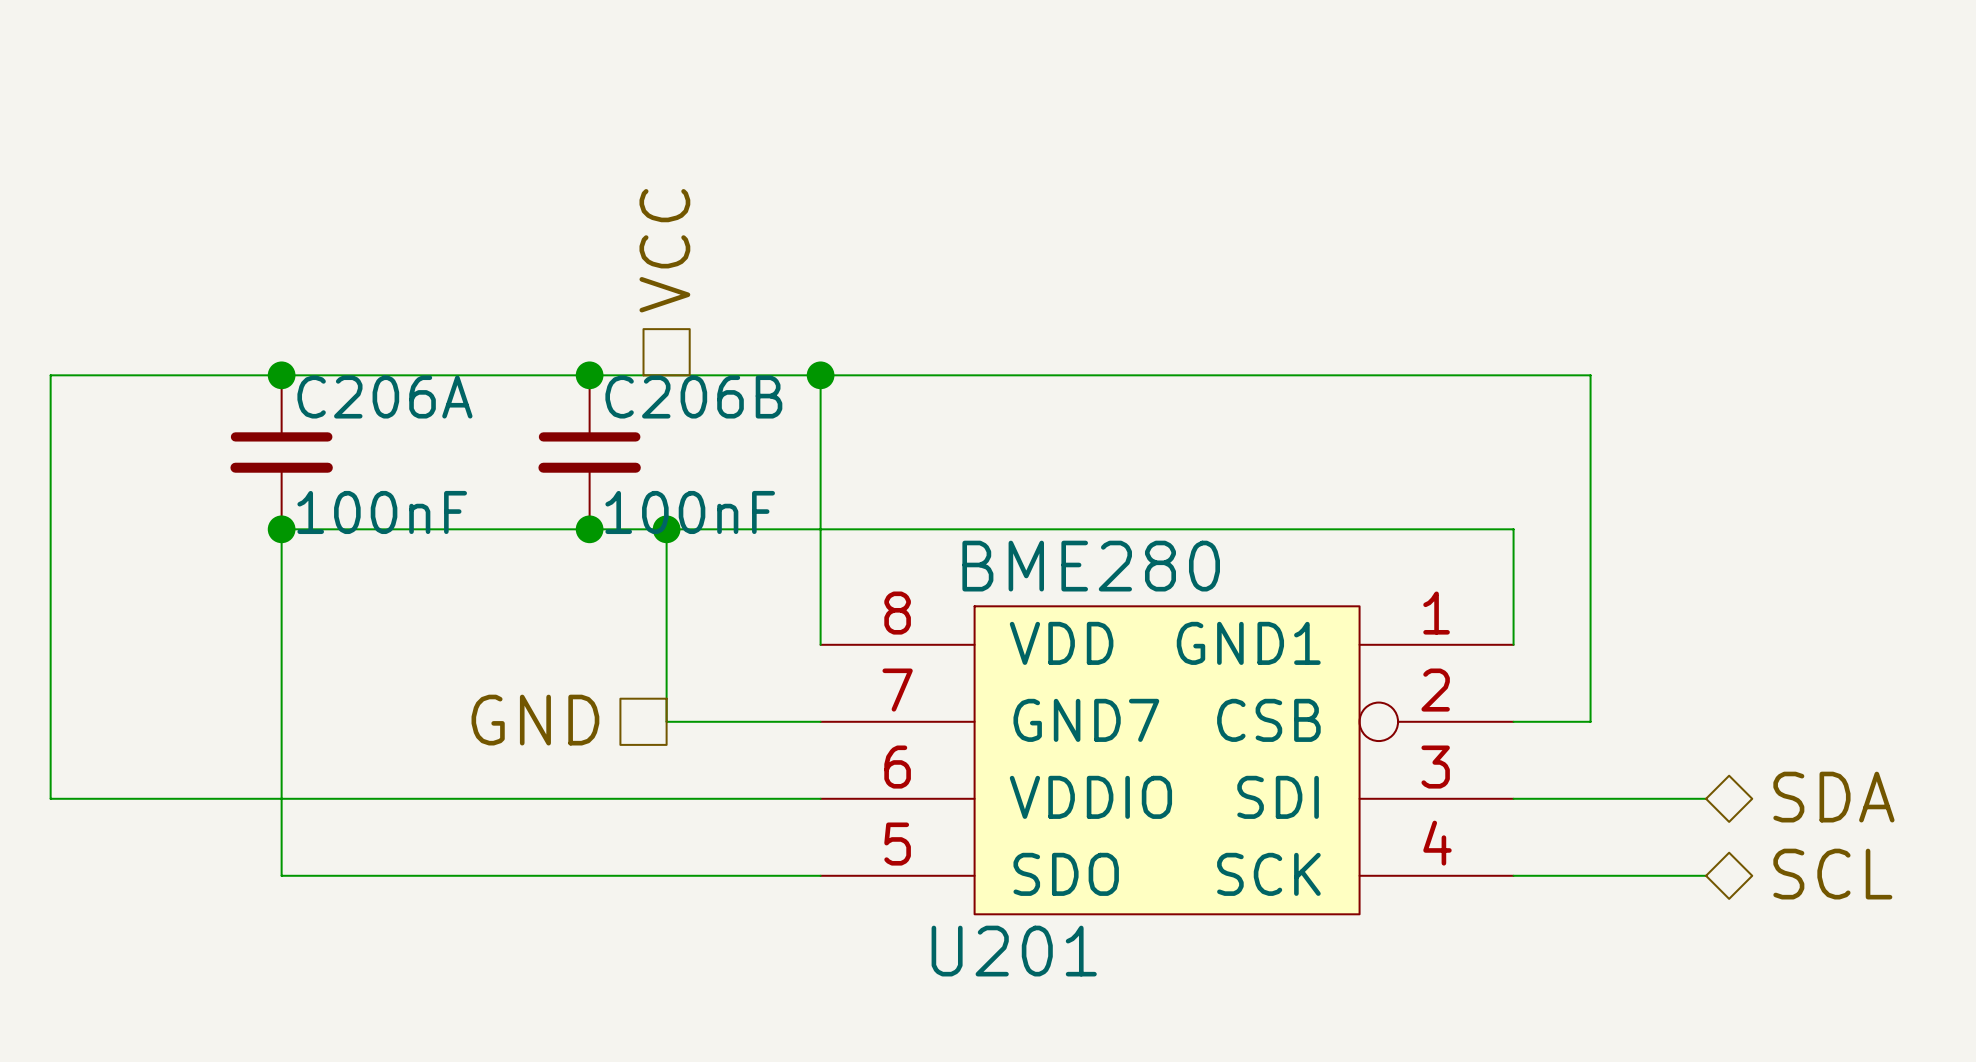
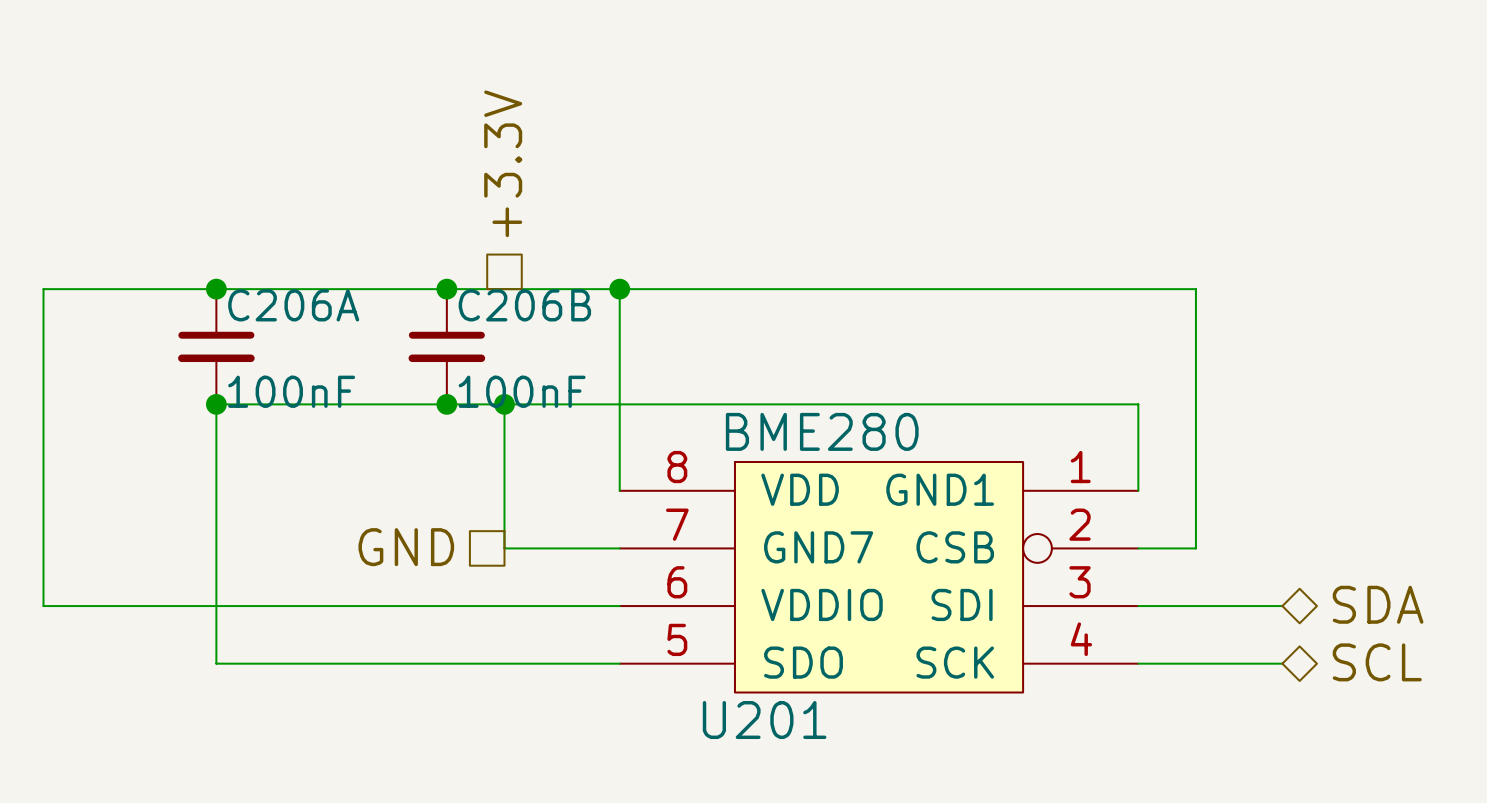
hierarchical label: VCC (664, 250) -> +3.3V (503, 163)

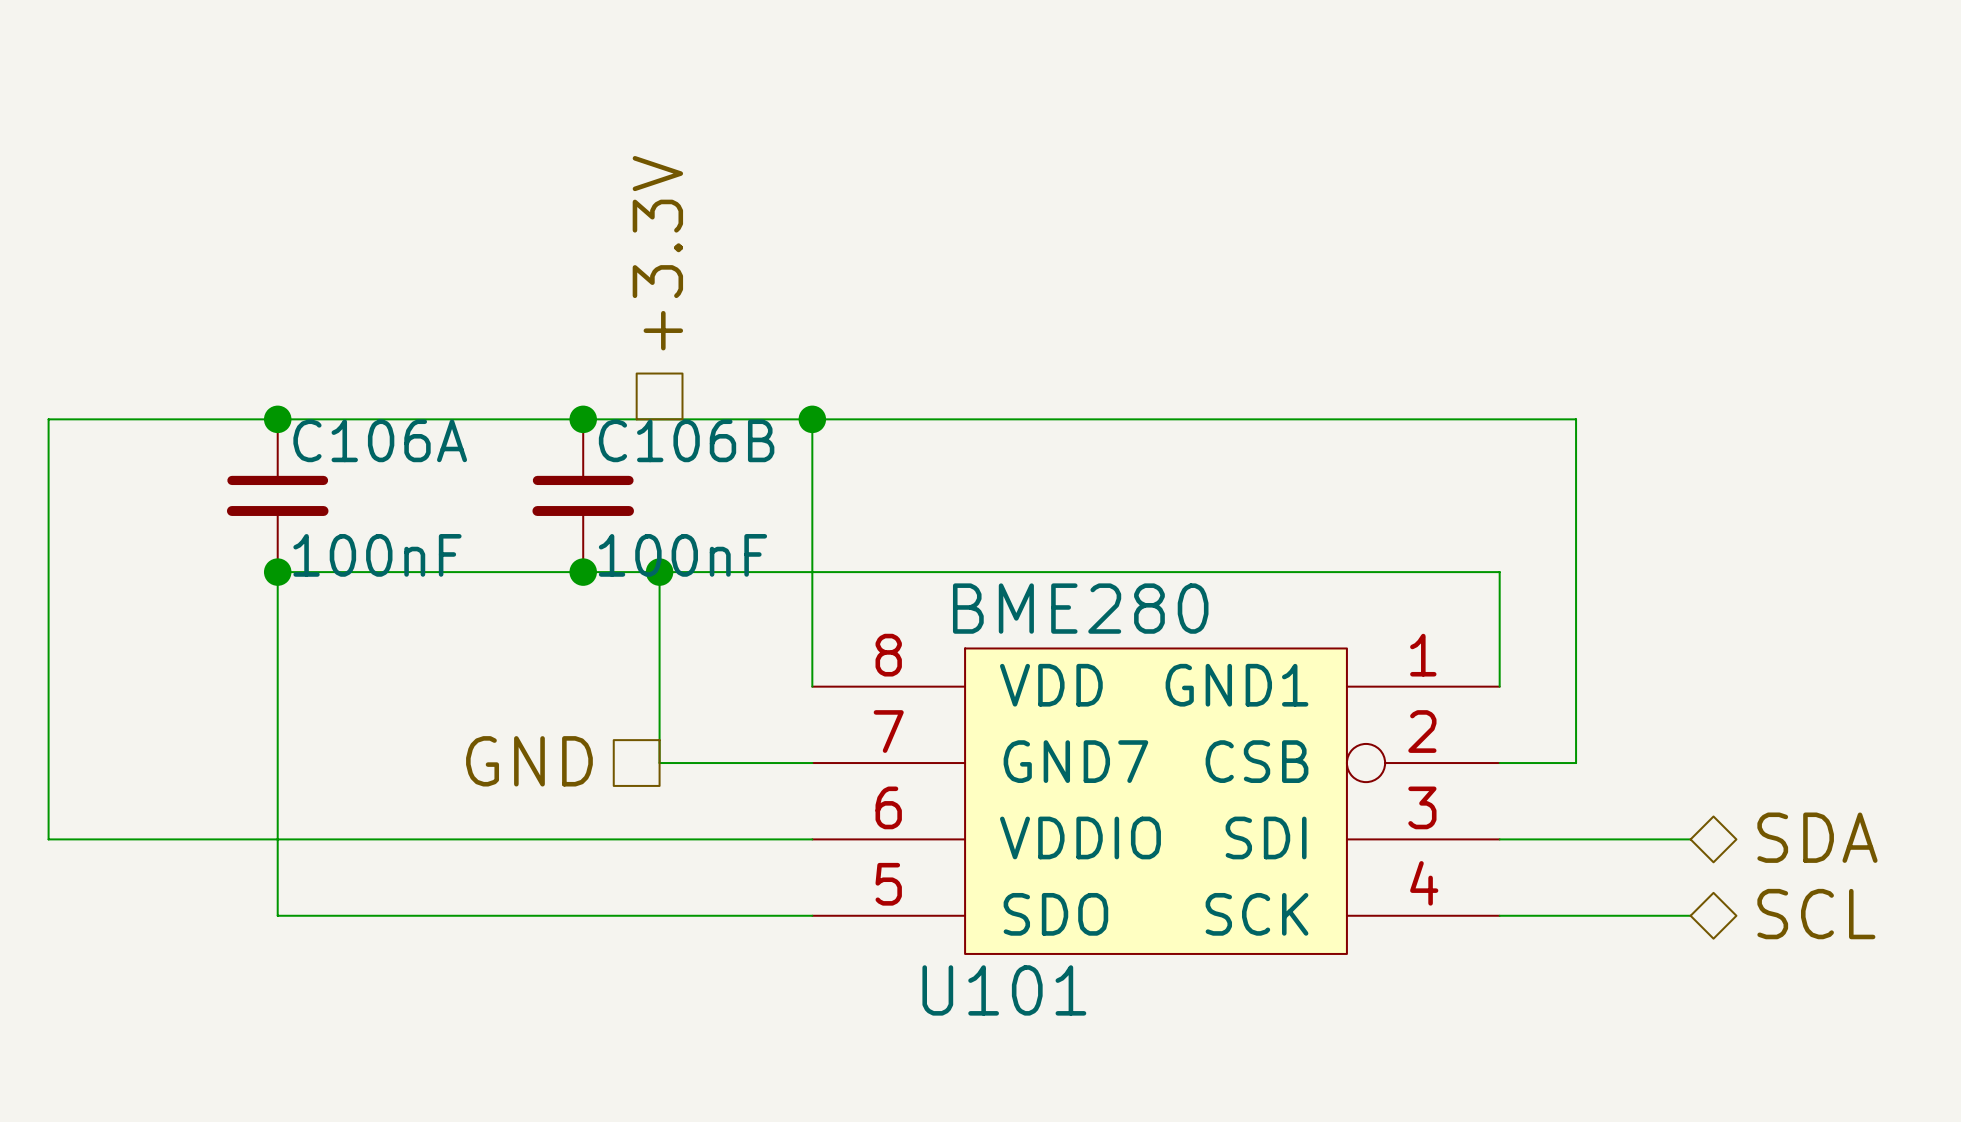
C206A name: C206A (293, 305) -> C106A (380, 440)
C206B name: C206B (524, 305) -> C106B (686, 440)
U201 name: U201 (764, 720) -> U101 (1004, 990)

